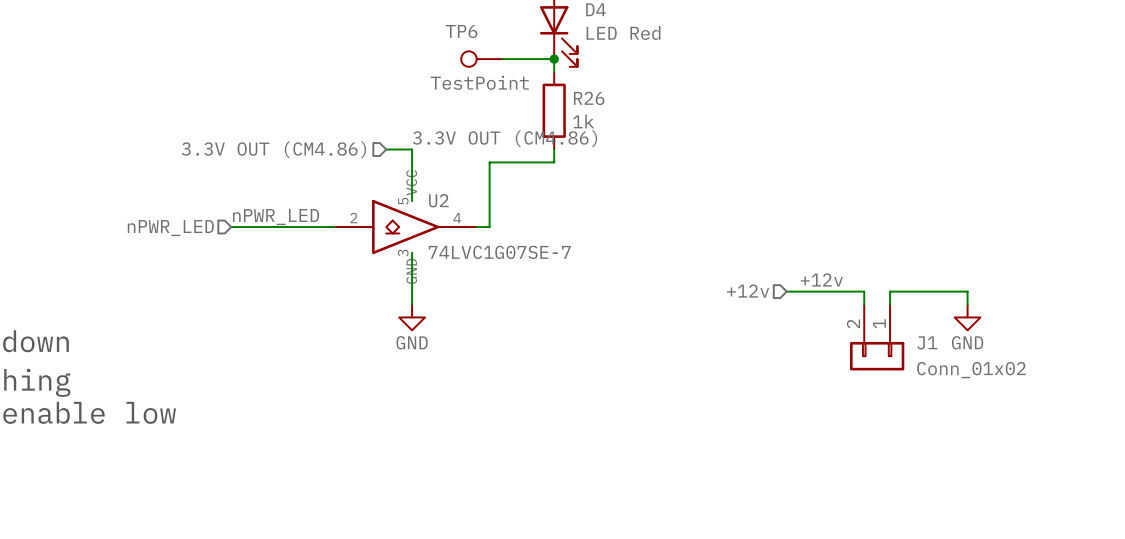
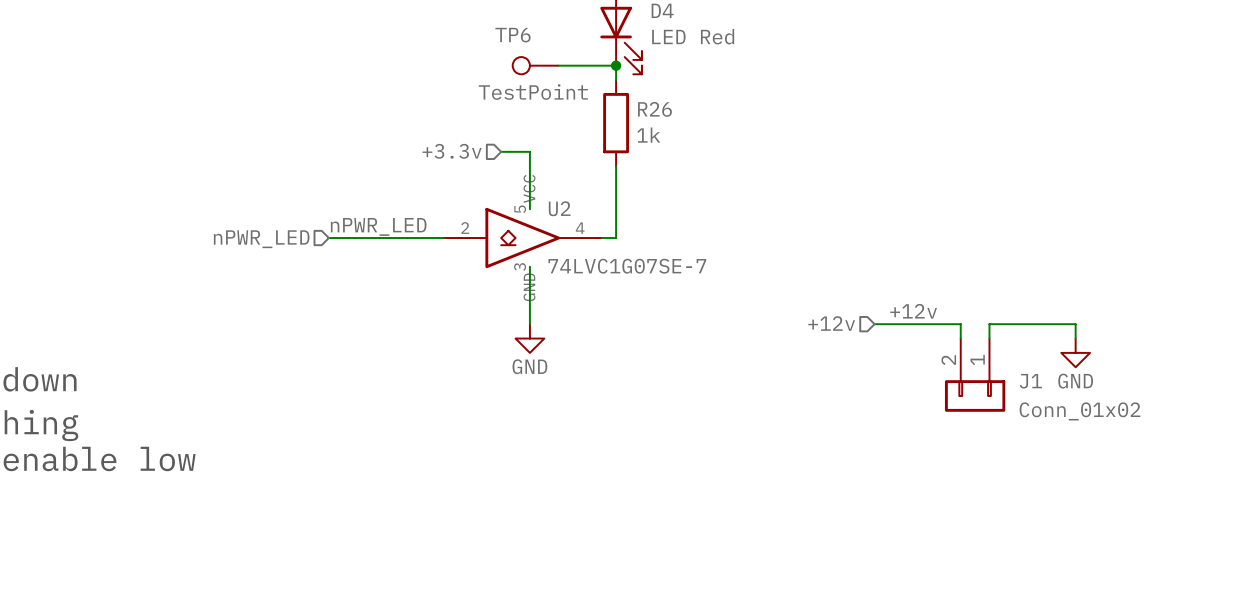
hierarchical label: none -> +3.3v (452, 151)
label: 3.3V OUT (CM4.86) (505, 138) -> none
hierarchical label: 3.3V OUT (CM4.86) (274, 149) -> none
wire: (386, 149) (412, 149) (412, 201) -> (501, 151) (529, 151) (529, 209)
wire: (554, 162) (489, 162) (489, 227) (476, 227) -> (616, 180) (616, 238) (601, 238)
label position: nPWR_LED (276, 217) -> nPWR_LED (378, 226)
wire: (231, 227) (334, 227) -> (328, 238) (443, 238)
U2 position: (405, 227) -> (522, 238)
hierarchical label position: nPWR_LED (170, 228) -> nPWR_LED (261, 239)
wire: (412, 252) (412, 304) -> (529, 266) (529, 324)
power symbol position: GND (412, 317) -> GND (529, 338)

